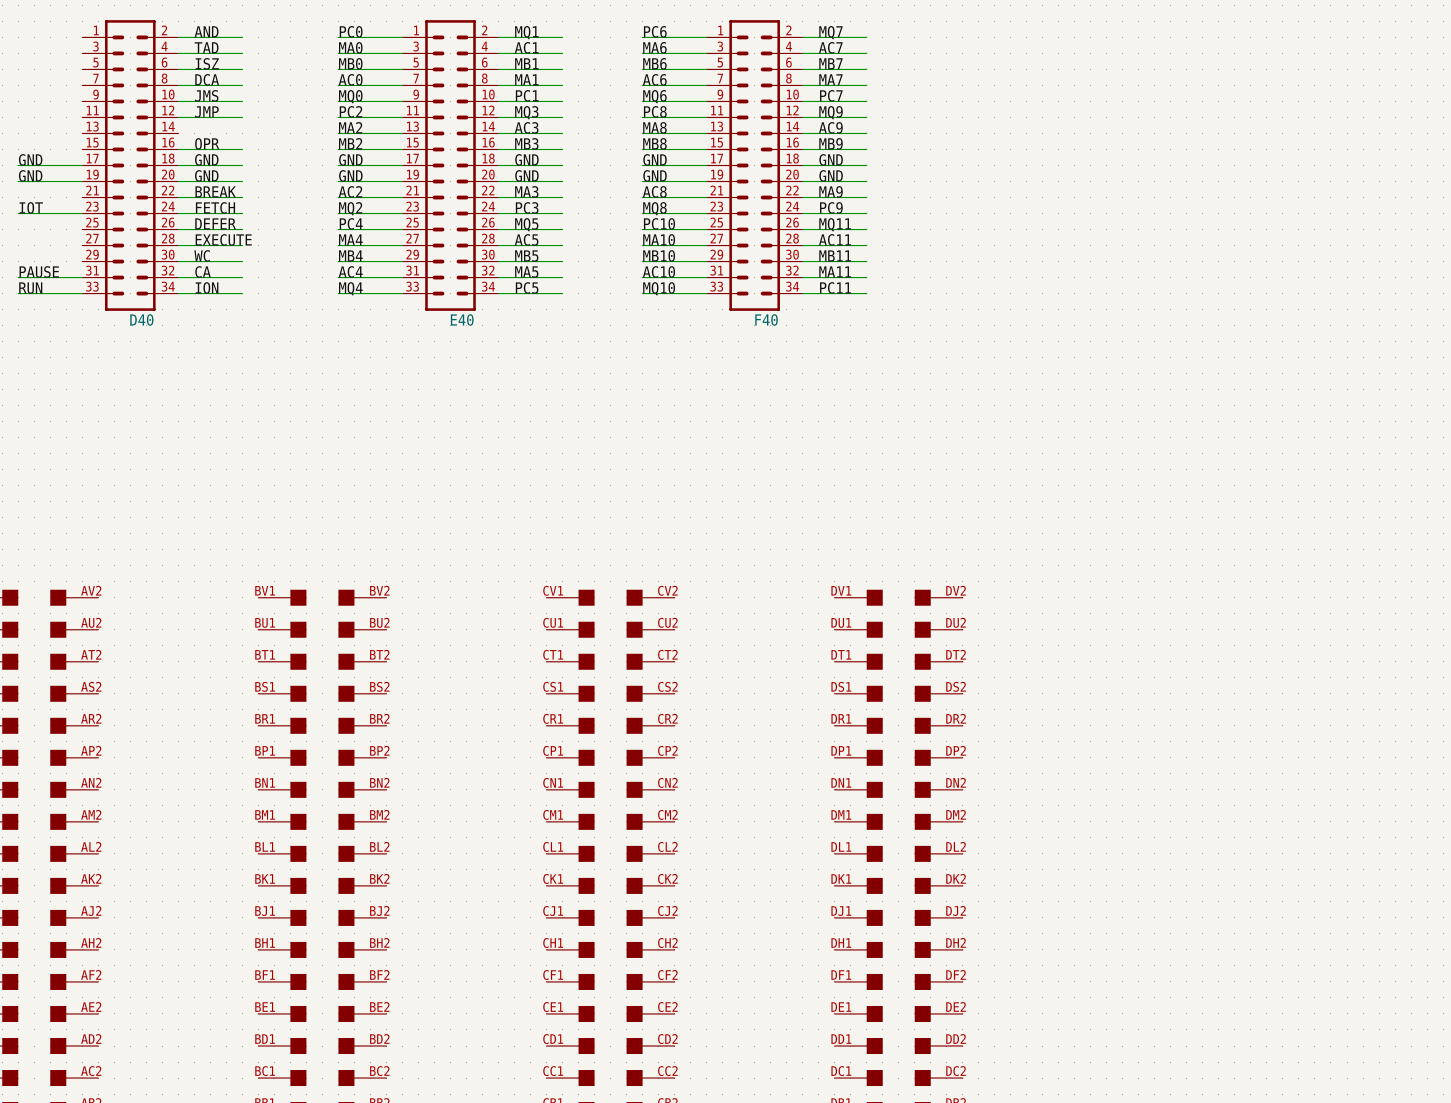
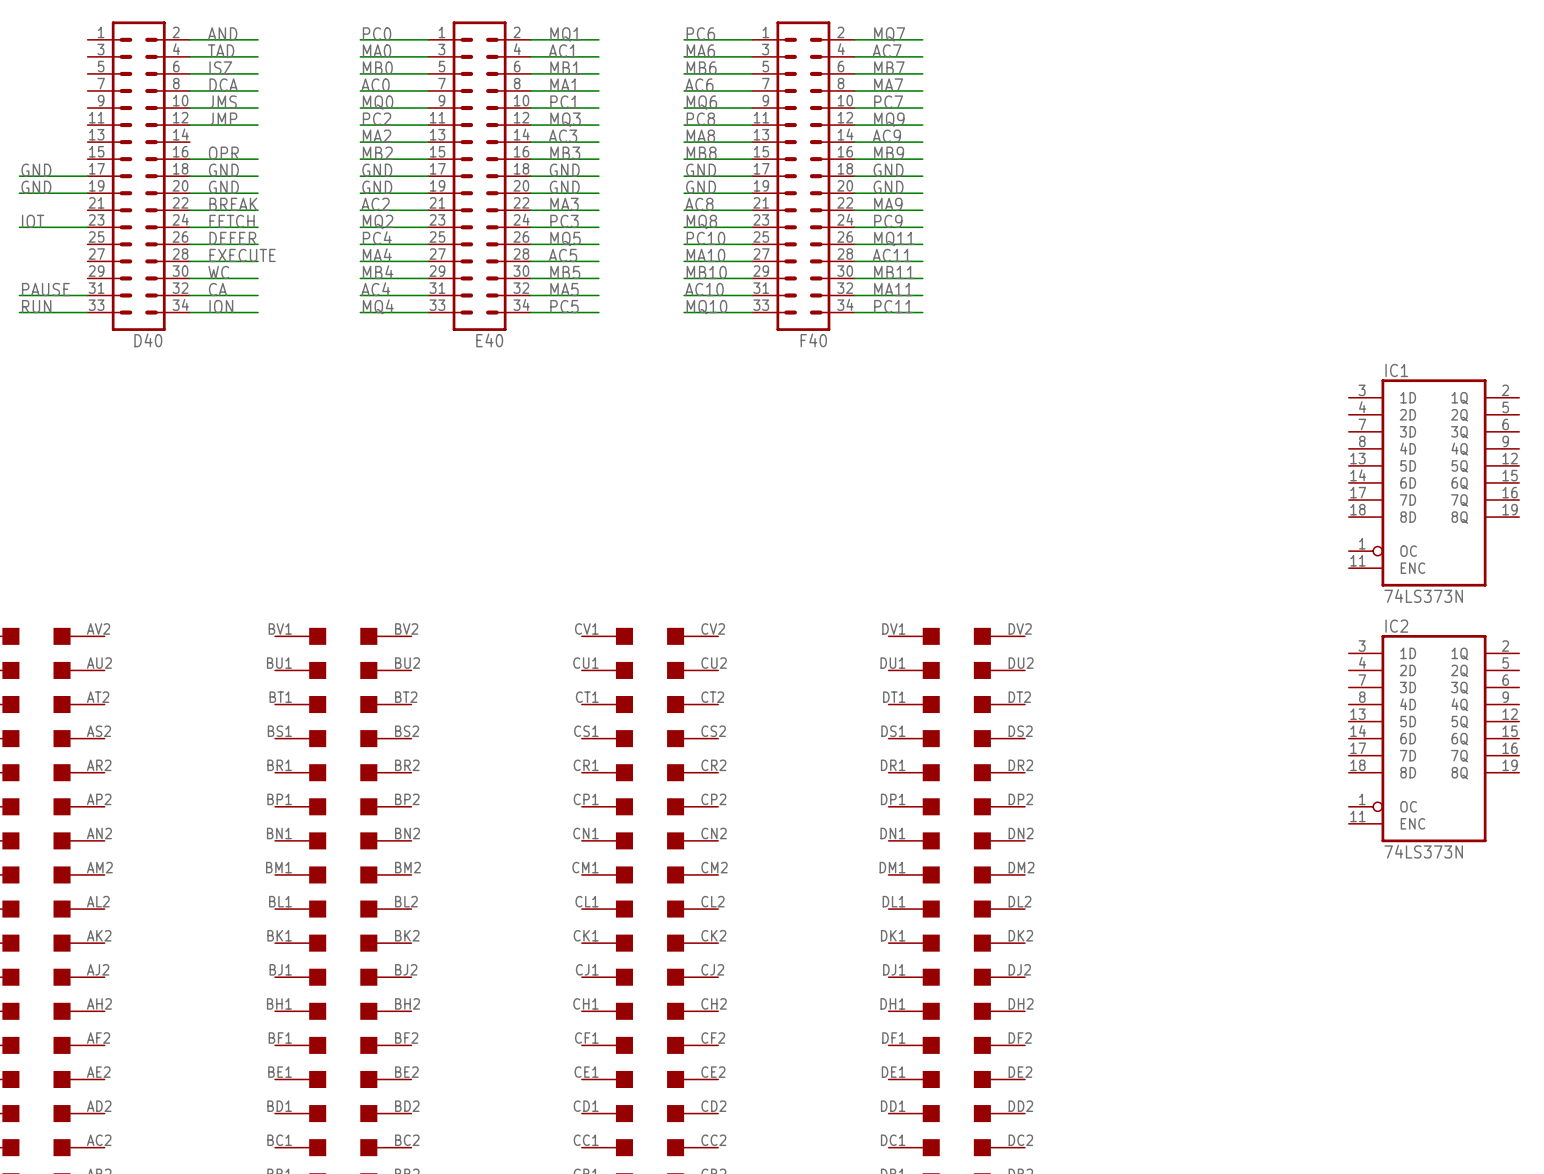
IC1: none -> 74LS373N (1434, 482)
IC2: none -> 74LS373N (1434, 738)

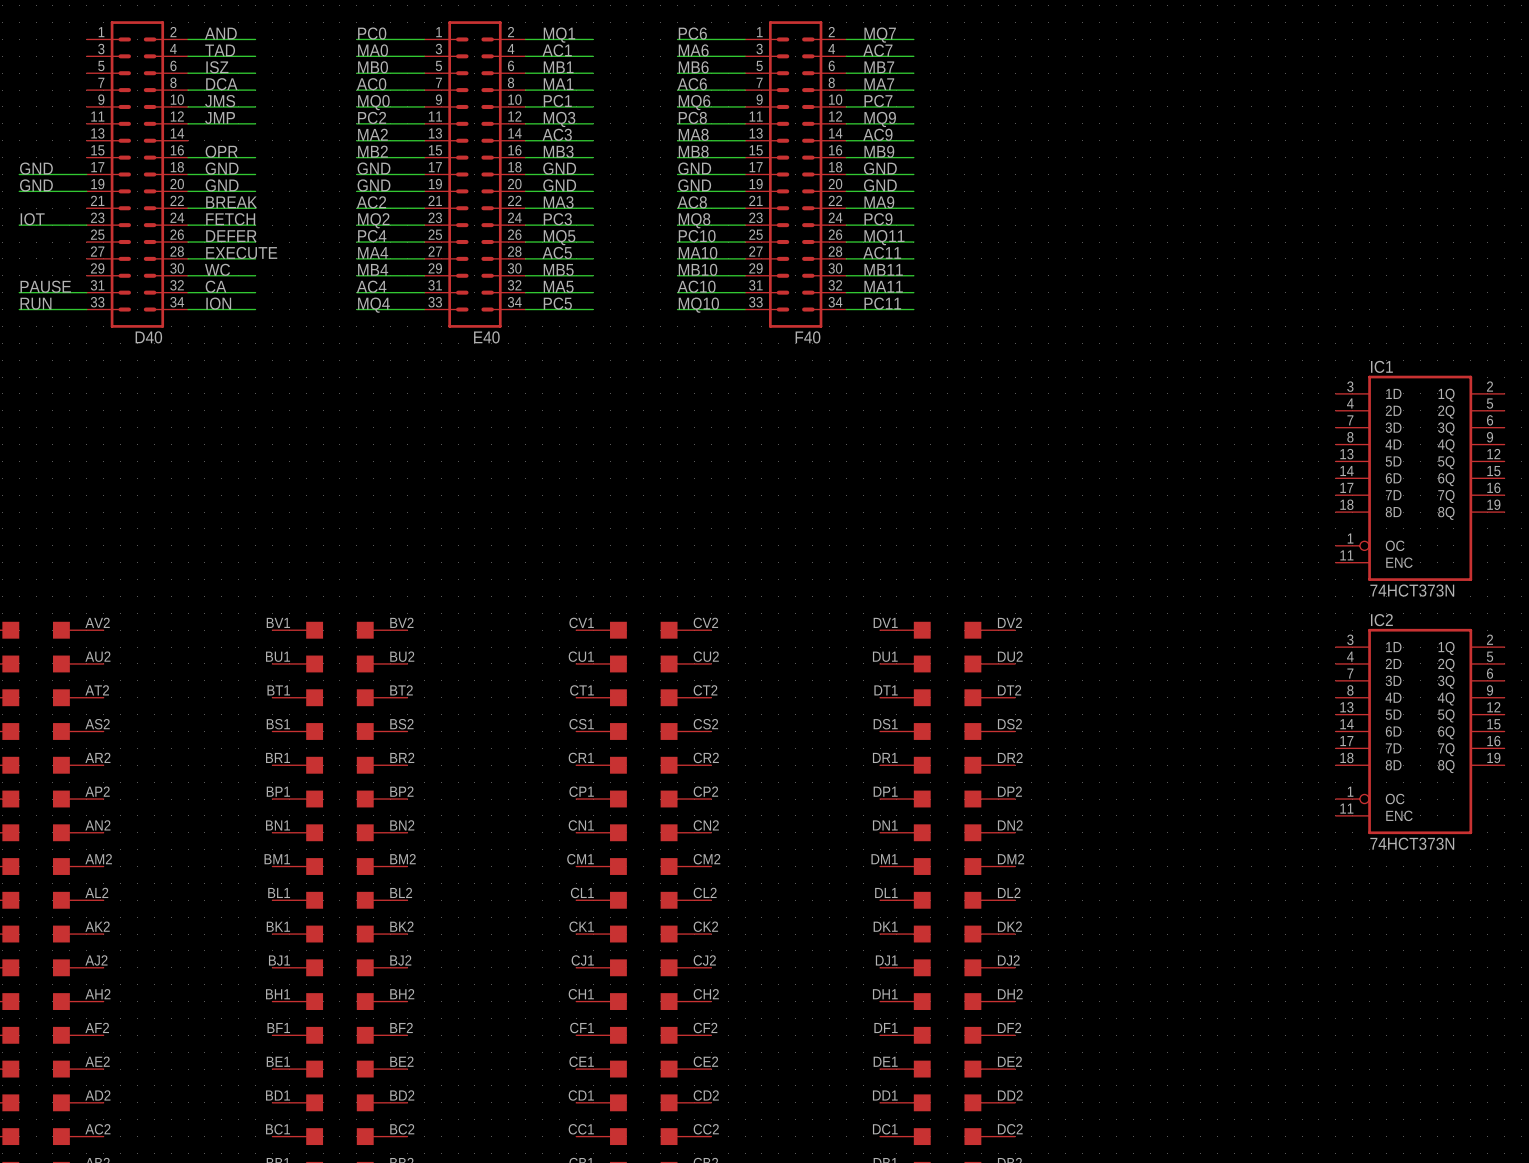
IC1 value: 74LS373N (1423, 596) -> 74HCT373N (1412, 590)
IC2 value: 74LS373N (1423, 851) -> 74HCT373N (1412, 843)

